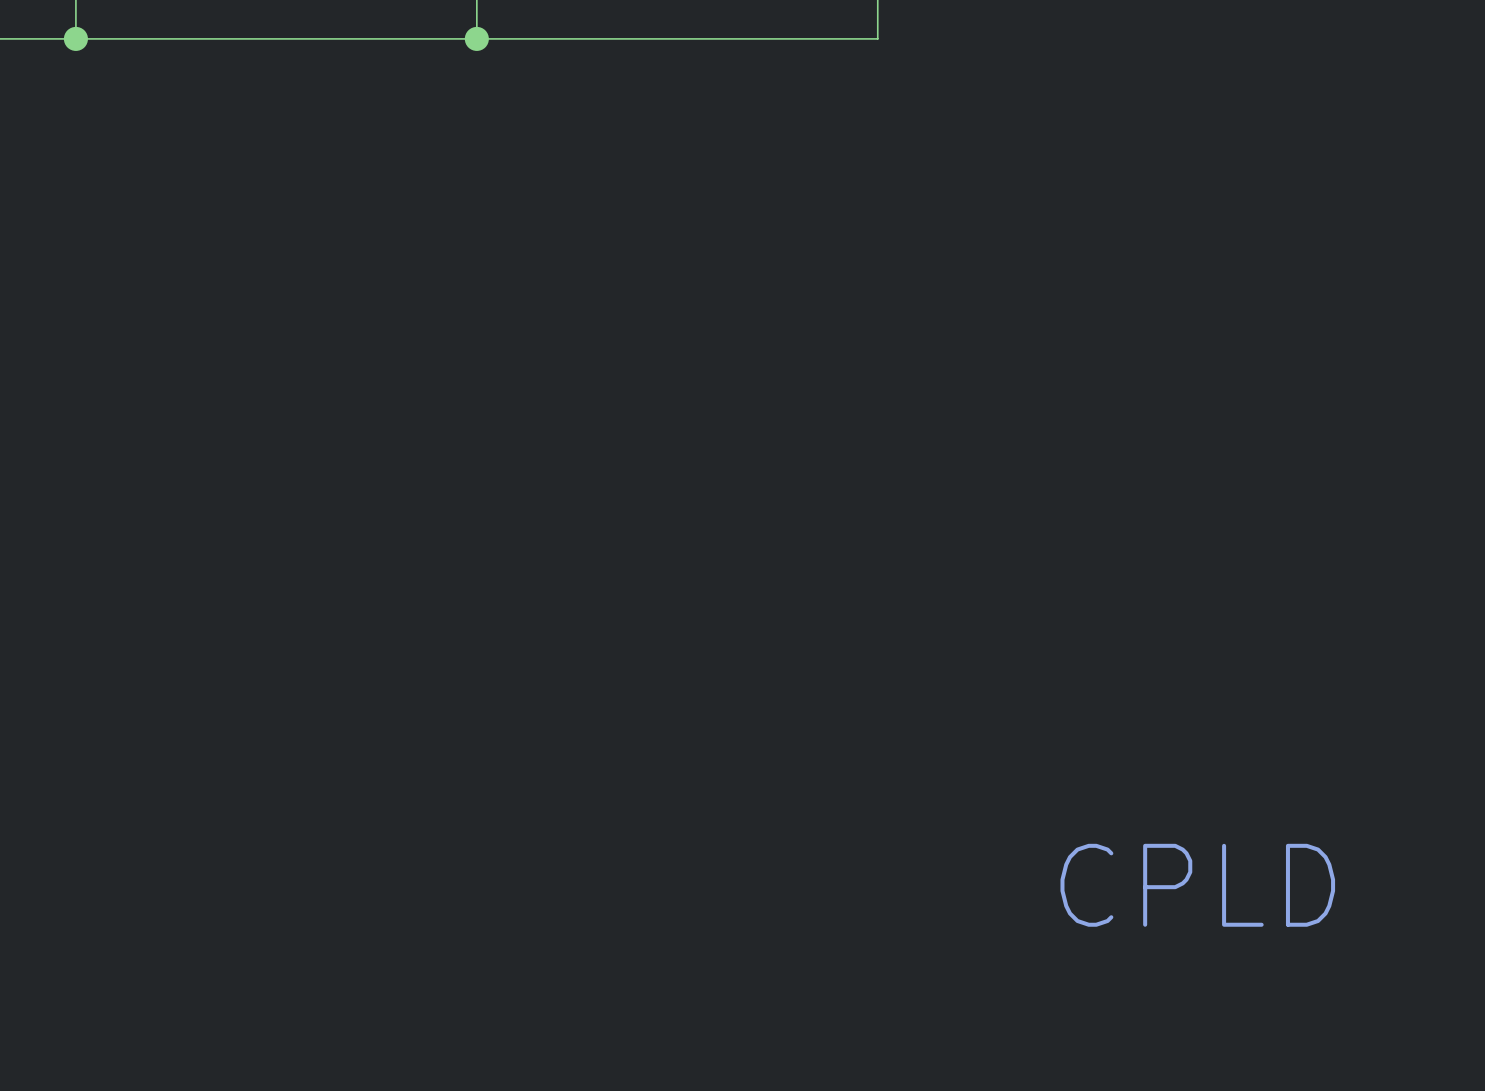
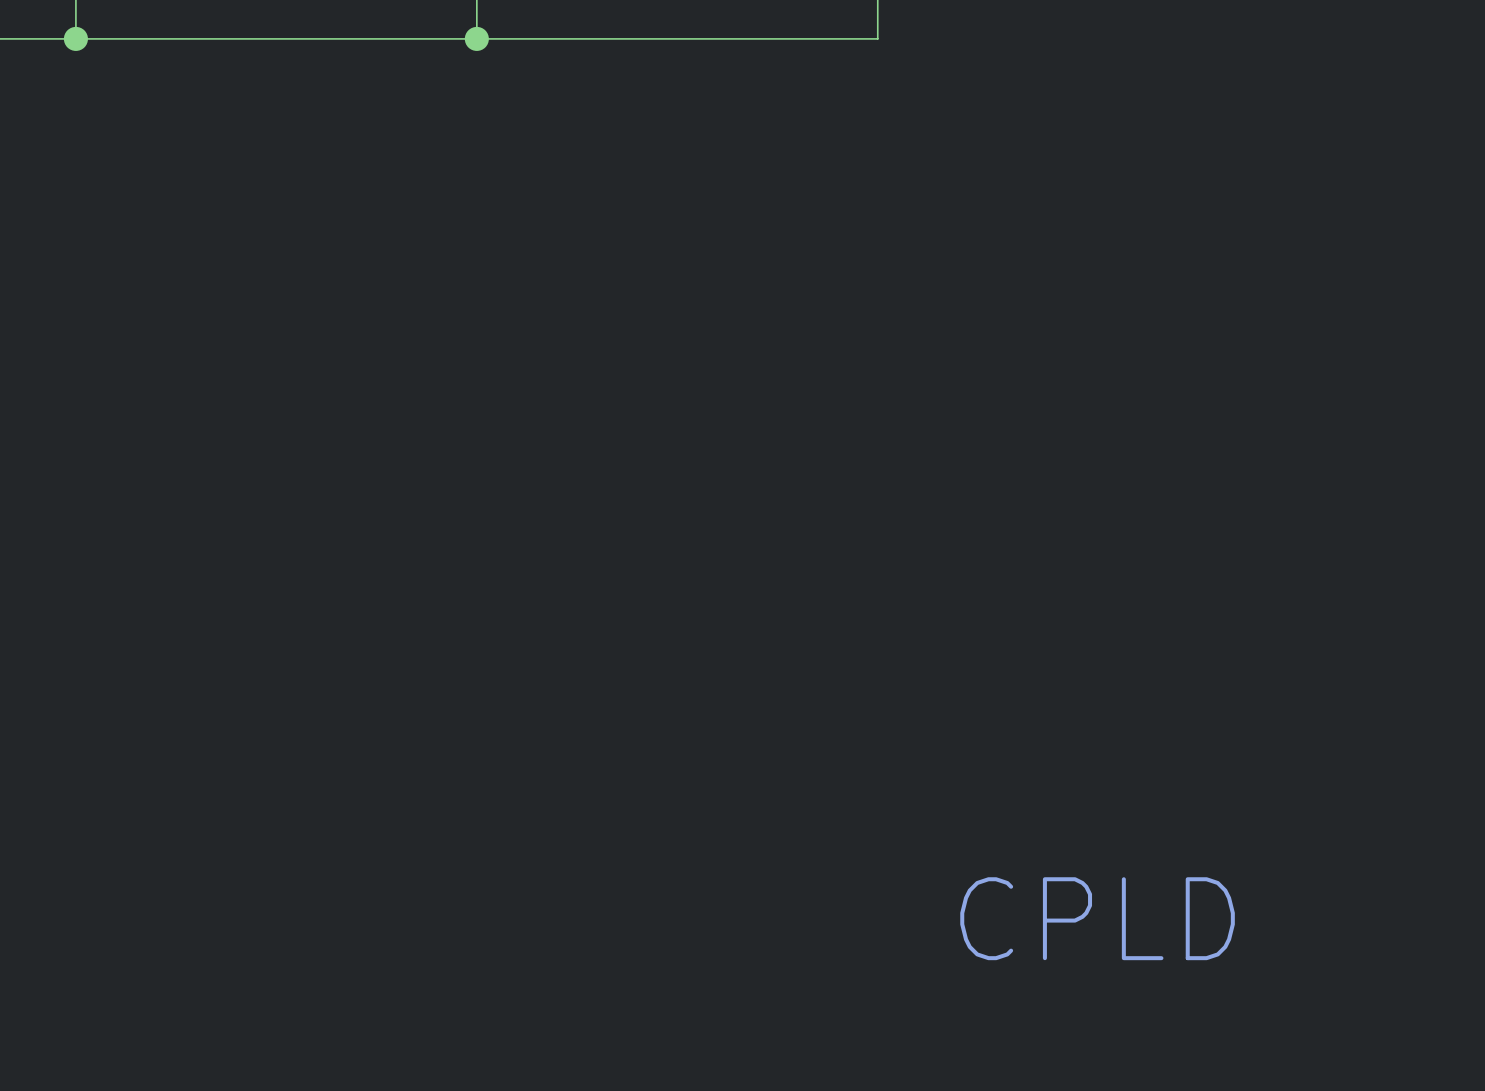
text position: CPLD (1197, 885) -> CPLD (1097, 918)

